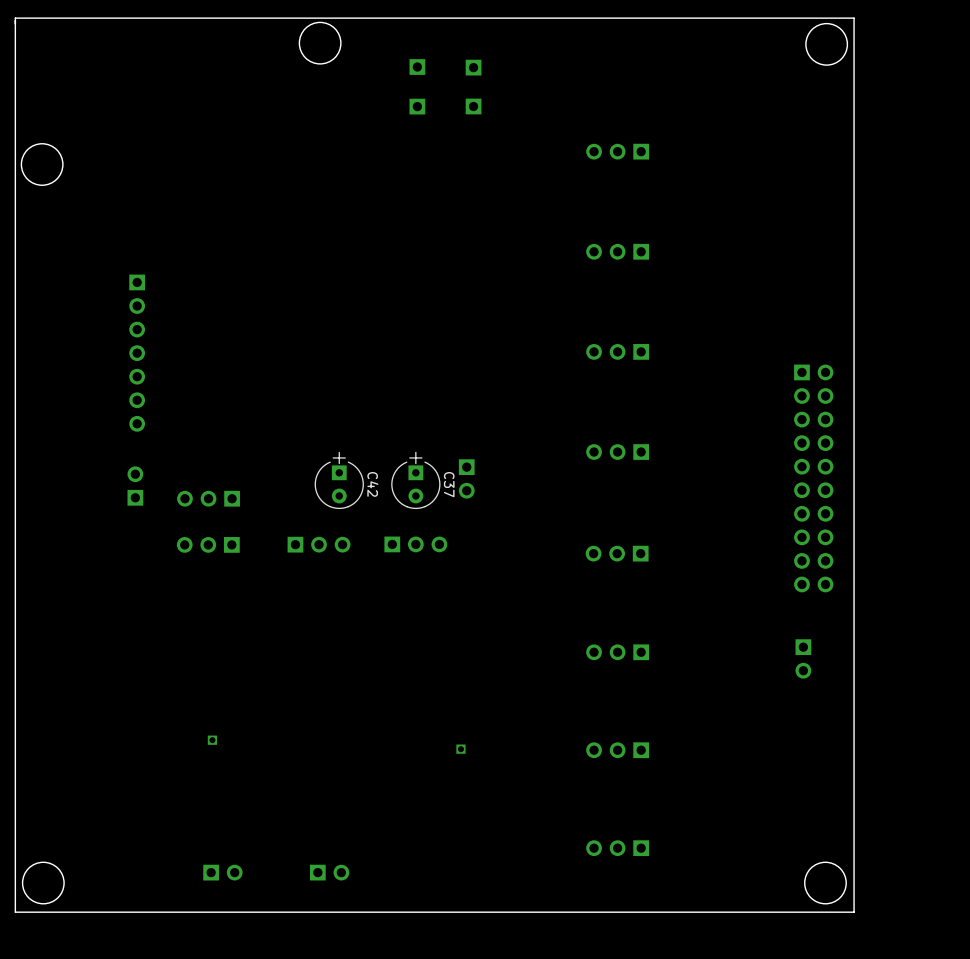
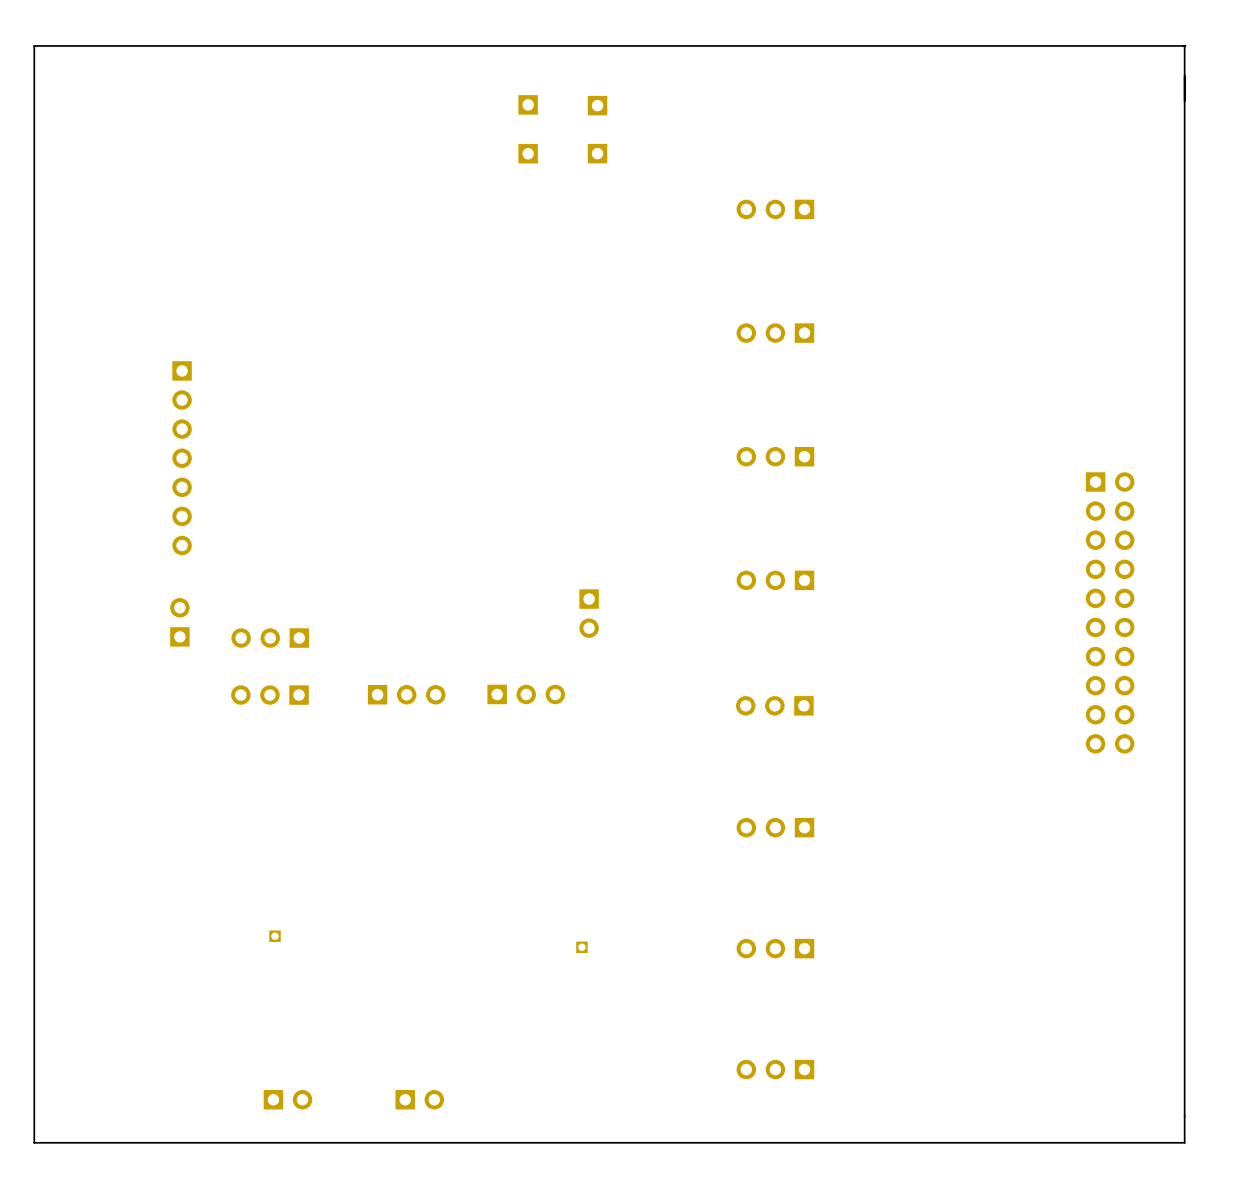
board edge: (854, 18) (15, 18) (15, 912) (854, 912) (854, 18) -> none
board edge: none -> (1185, 45) (34, 45) (34, 1142) (1184, 1142) (1183, 46)
round board edge: [298, 21, 342, 65] -> none
round board edge: [805, 22, 849, 66] -> none
round board edge: [20, 143, 64, 186] -> none
part position: (813, 478) -> (1110, 612)
C42: (339, 480) -> none
C37: (415, 480) -> none
part: (803, 658) -> none
round board edge: [21, 861, 65, 905] -> none
round board edge: [804, 861, 847, 905] -> none

